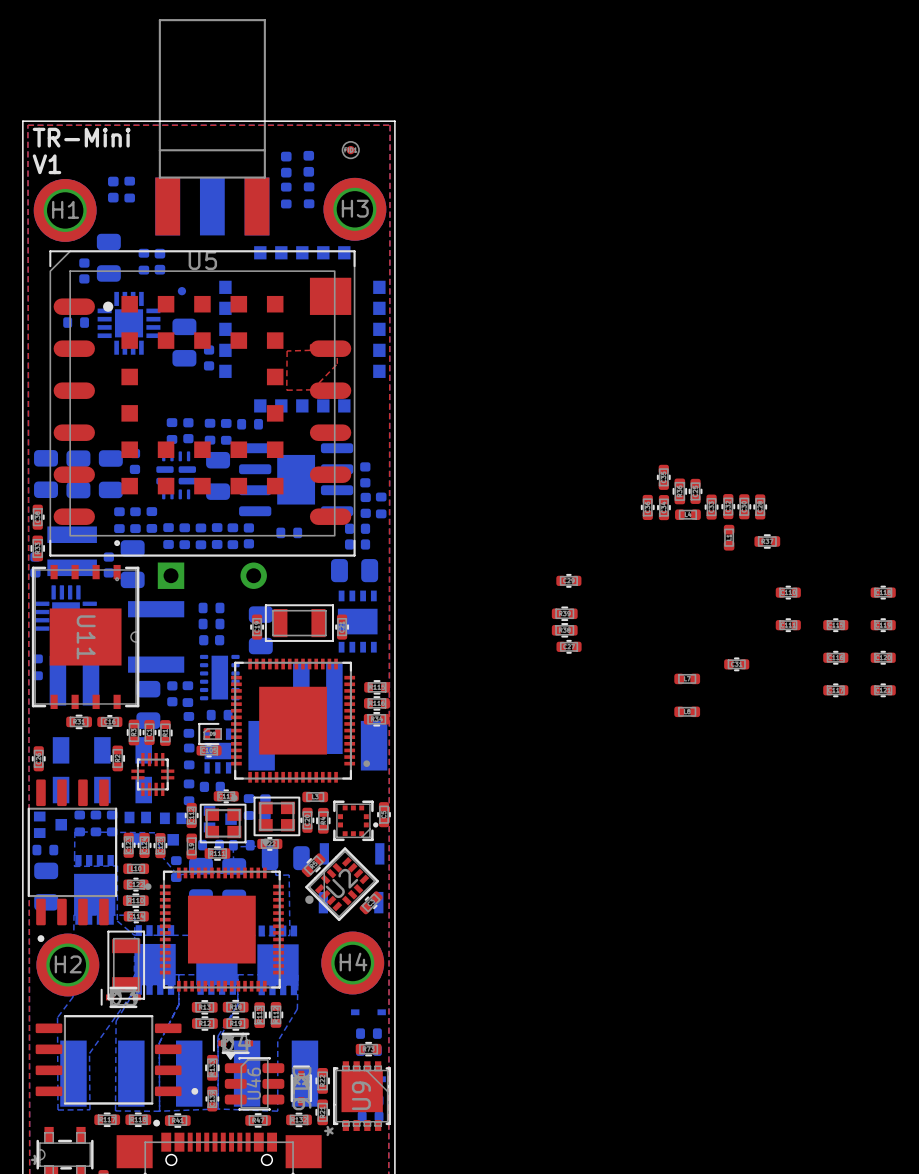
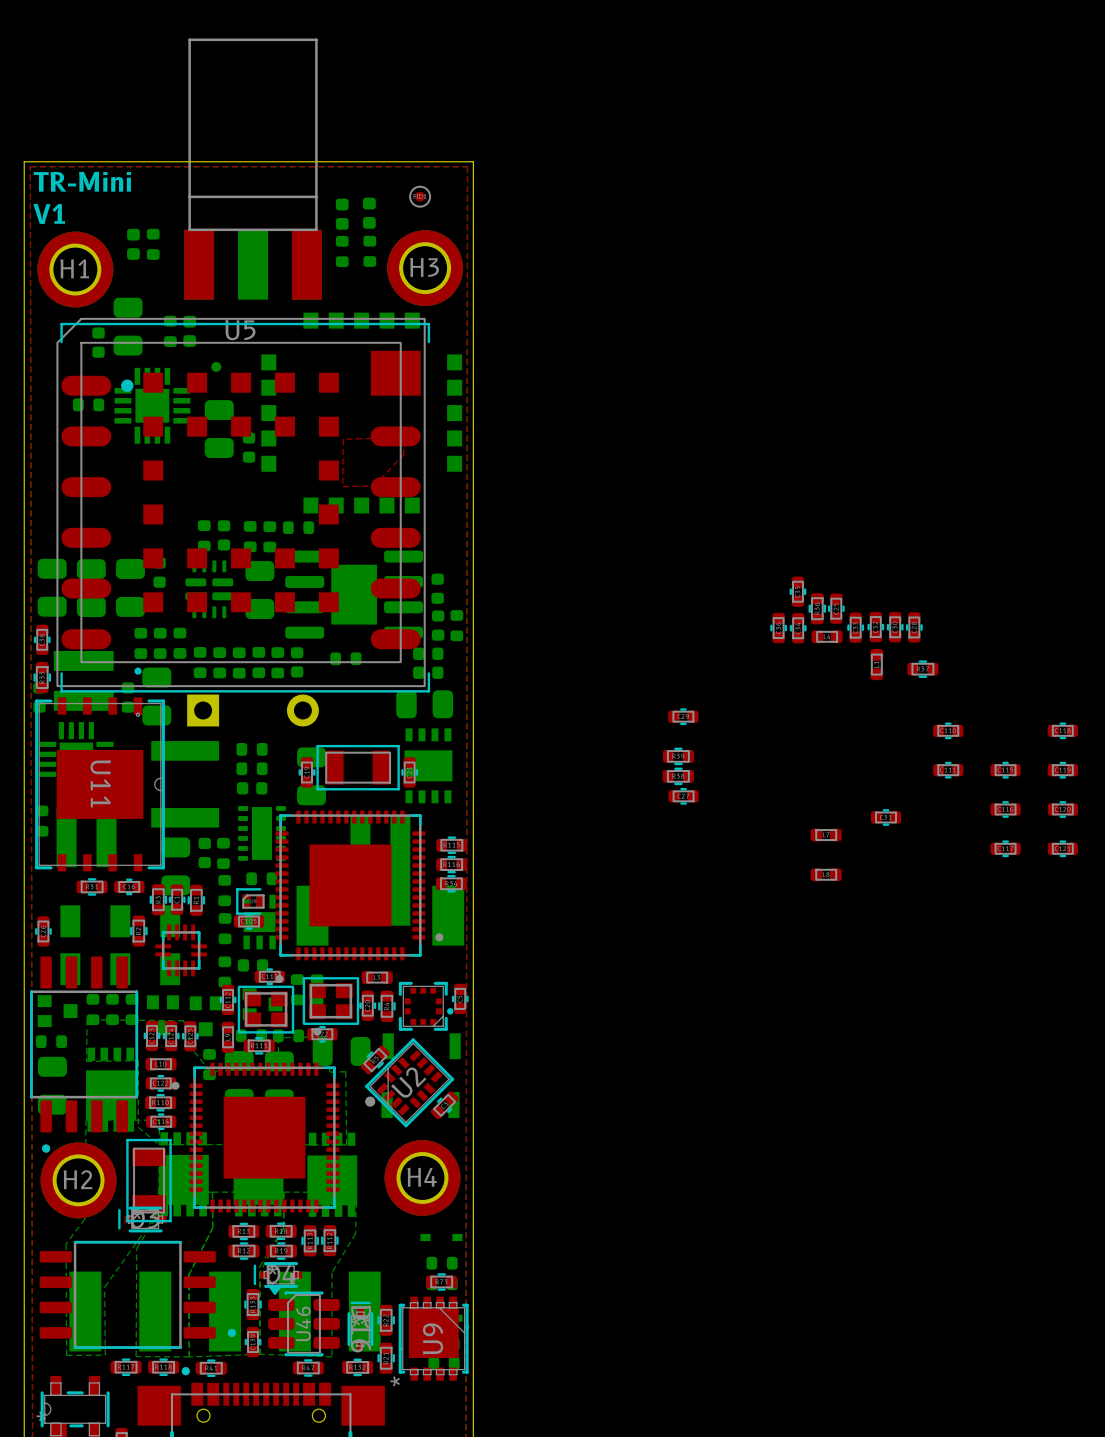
U5 footprint: [49, 250, 356, 557] -> [56, 317, 431, 693]

